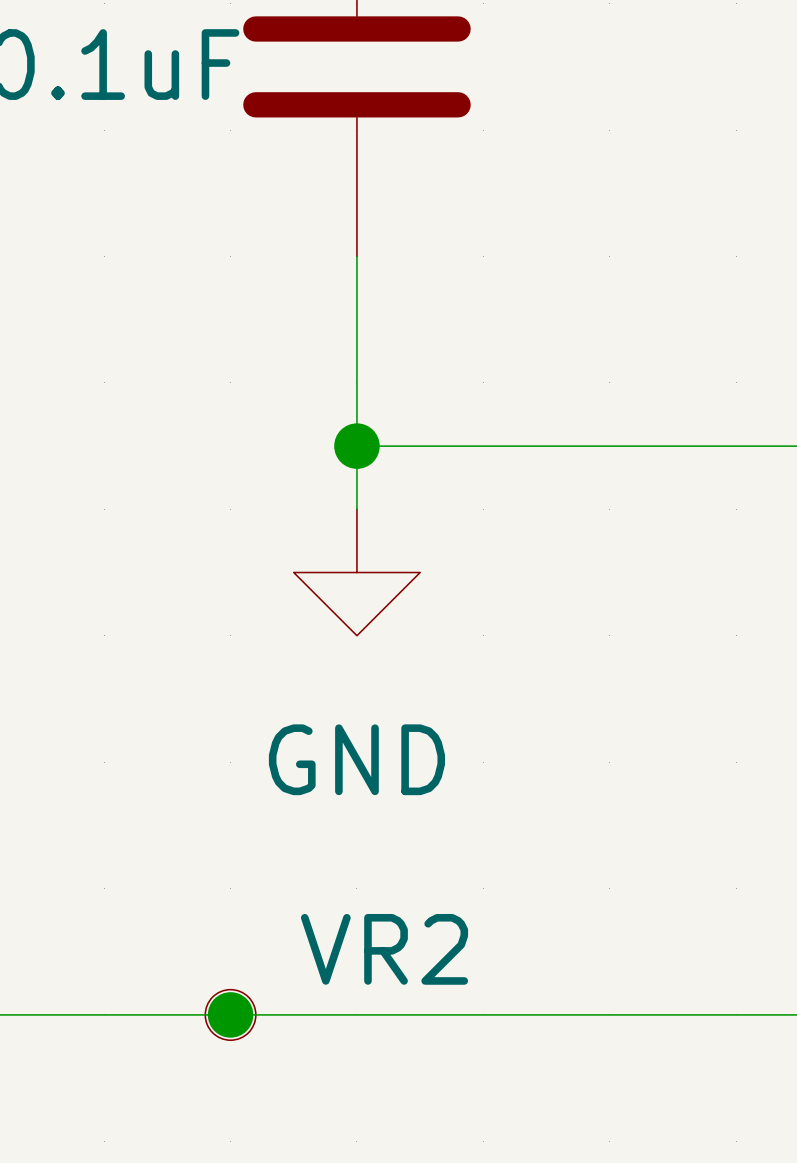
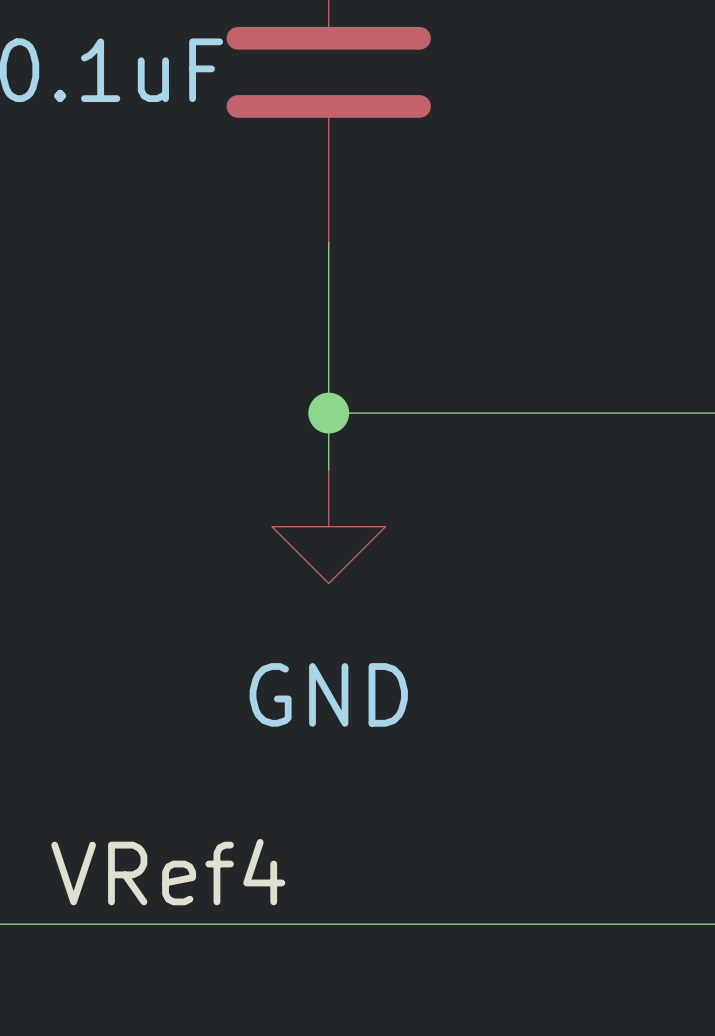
label: none -> VRef4 (168, 872)
junction: (230, 1014) -> none
VR2: (230, 1014) -> none

